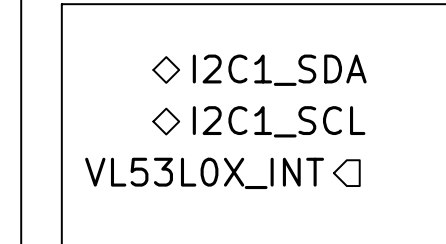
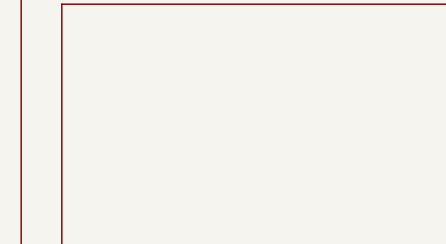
hierarchical label: I2C1_SDA (279, 70) -> none
hierarchical label: I2C1_SCL (279, 121) -> none
hierarchical label: VL53L0X_INT (204, 173) -> none

